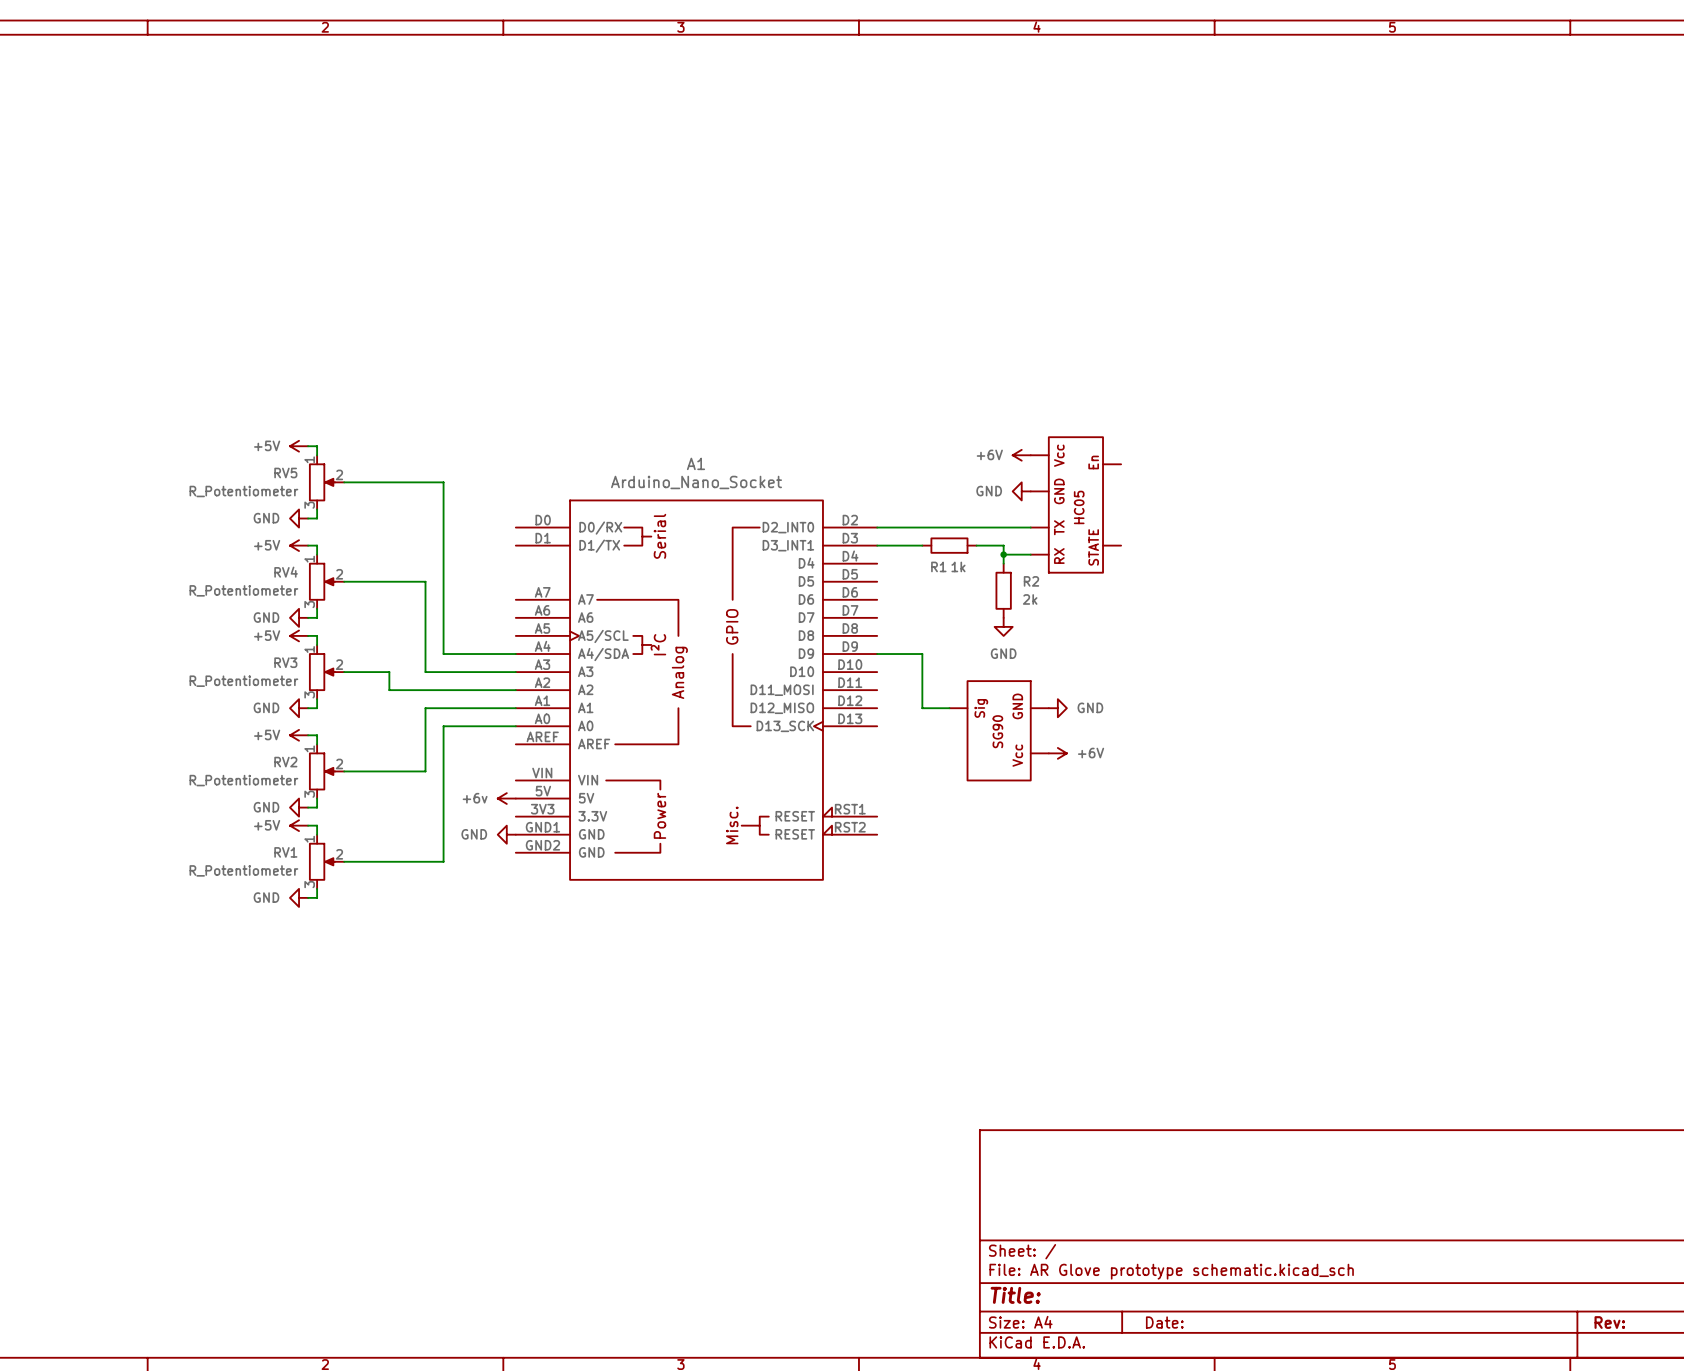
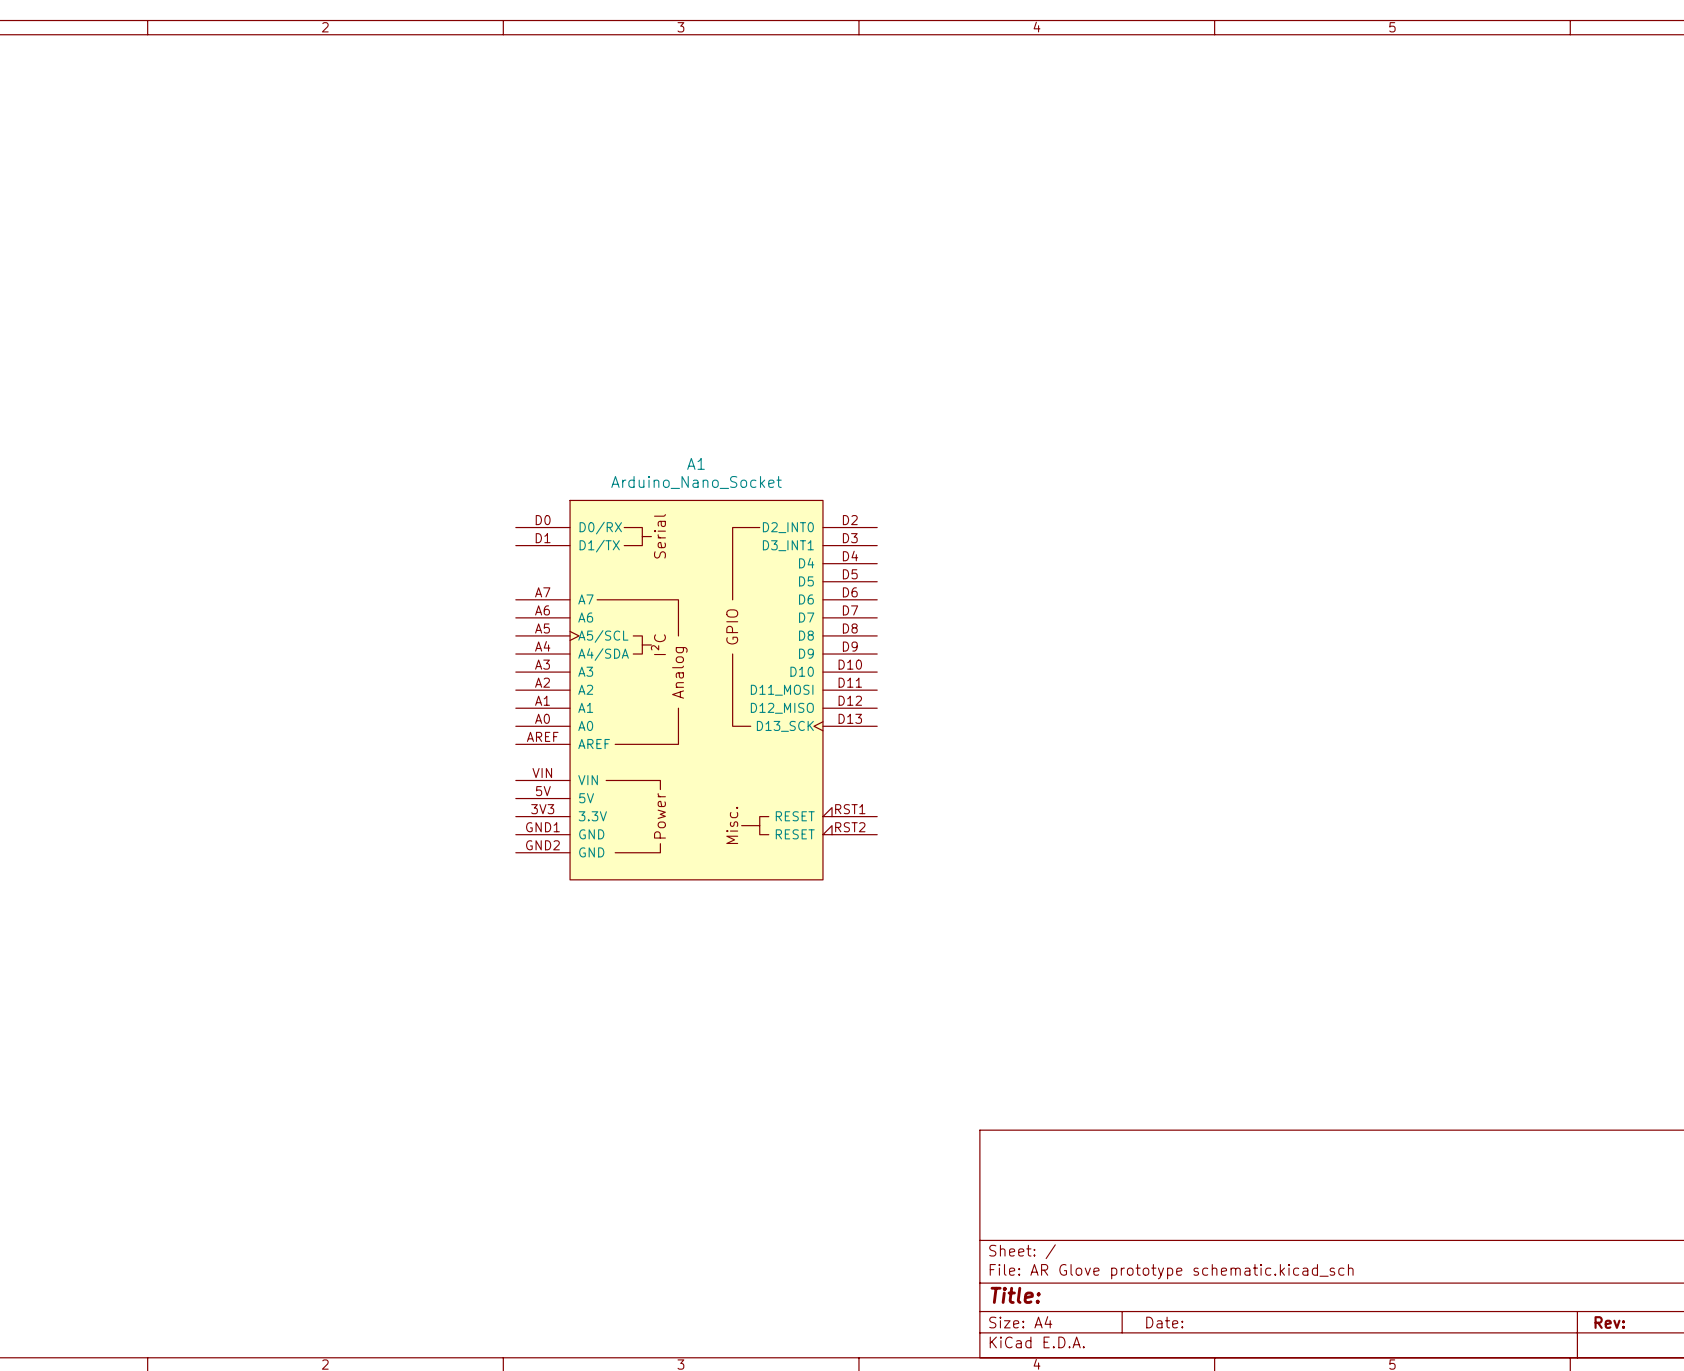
power symbol: +5V (299, 446) -> none
wire: (308, 446) (317, 446) (317, 455) -> none
power symbol: +6V (1021, 455) -> none
RV5: R_Potentiometer (326, 482) -> none
wire: (344, 482) (443, 482) (443, 654) (515, 654) -> none
power symbol: GND (1021, 491) -> none
part: (1075, 504) -> none
wire: (317, 509) (317, 518) (308, 518) -> none
power symbol: GND (299, 518) -> none
wire: (877, 527) (1030, 527) -> none
power symbol: +5V (299, 545) -> none
wire: (308, 545) (317, 545) (317, 554) -> none
wire: (877, 545) (922, 545) -> none
R1: 1k (949, 545) -> none
wire: (976, 545) (1003, 545) (1003, 563) -> none
wire: (1003, 554) (1030, 554) -> none
junction: (1003, 554) -> none
RV4: R_Potentiometer (326, 581) -> none
wire: (344, 581) (425, 581) (425, 672) (515, 672) -> none
R2: 2k (1003, 590) -> none
wire: (317, 608) (317, 617) (308, 617) -> none
power symbol: GND (299, 617) -> none
power symbol: GND (1003, 626) -> none
power symbol: +5V (299, 635) -> none
wire: (308, 635) (317, 635) (317, 644) -> none
wire: (877, 654) (922, 654) (922, 708) (949, 708) -> none
RV3: R_Potentiometer (326, 672) -> none
wire: (344, 672) (389, 672) (389, 690) (515, 690) -> none
wire: (317, 699) (317, 708) (308, 708) -> none
power symbol: GND (299, 708) -> none
wire: (515, 708) (425, 708) (425, 771) (344, 771) -> none
power symbol: GND (1057, 708) -> none
wire: (515, 726) (443, 726) (443, 861) (344, 861) -> none
part: (999, 730) -> none
power symbol: +5V (299, 735) -> none
wire: (308, 735) (317, 735) (317, 744) -> none
power symbol: +6V (1057, 753) -> none
RV2: R_Potentiometer (326, 771) -> none
wire: (317, 798) (317, 807) (308, 807) -> none
power symbol: +6v (506, 798) -> none
power symbol: GND (299, 807) -> none
power symbol: +5V (299, 825) -> none
wire: (308, 825) (317, 825) (317, 834) -> none
power symbol: GND (506, 834) -> none
RV1: R_Potentiometer (326, 861) -> none
wire: (317, 888) (317, 897) (308, 897) -> none
power symbol: GND (299, 897) -> none

